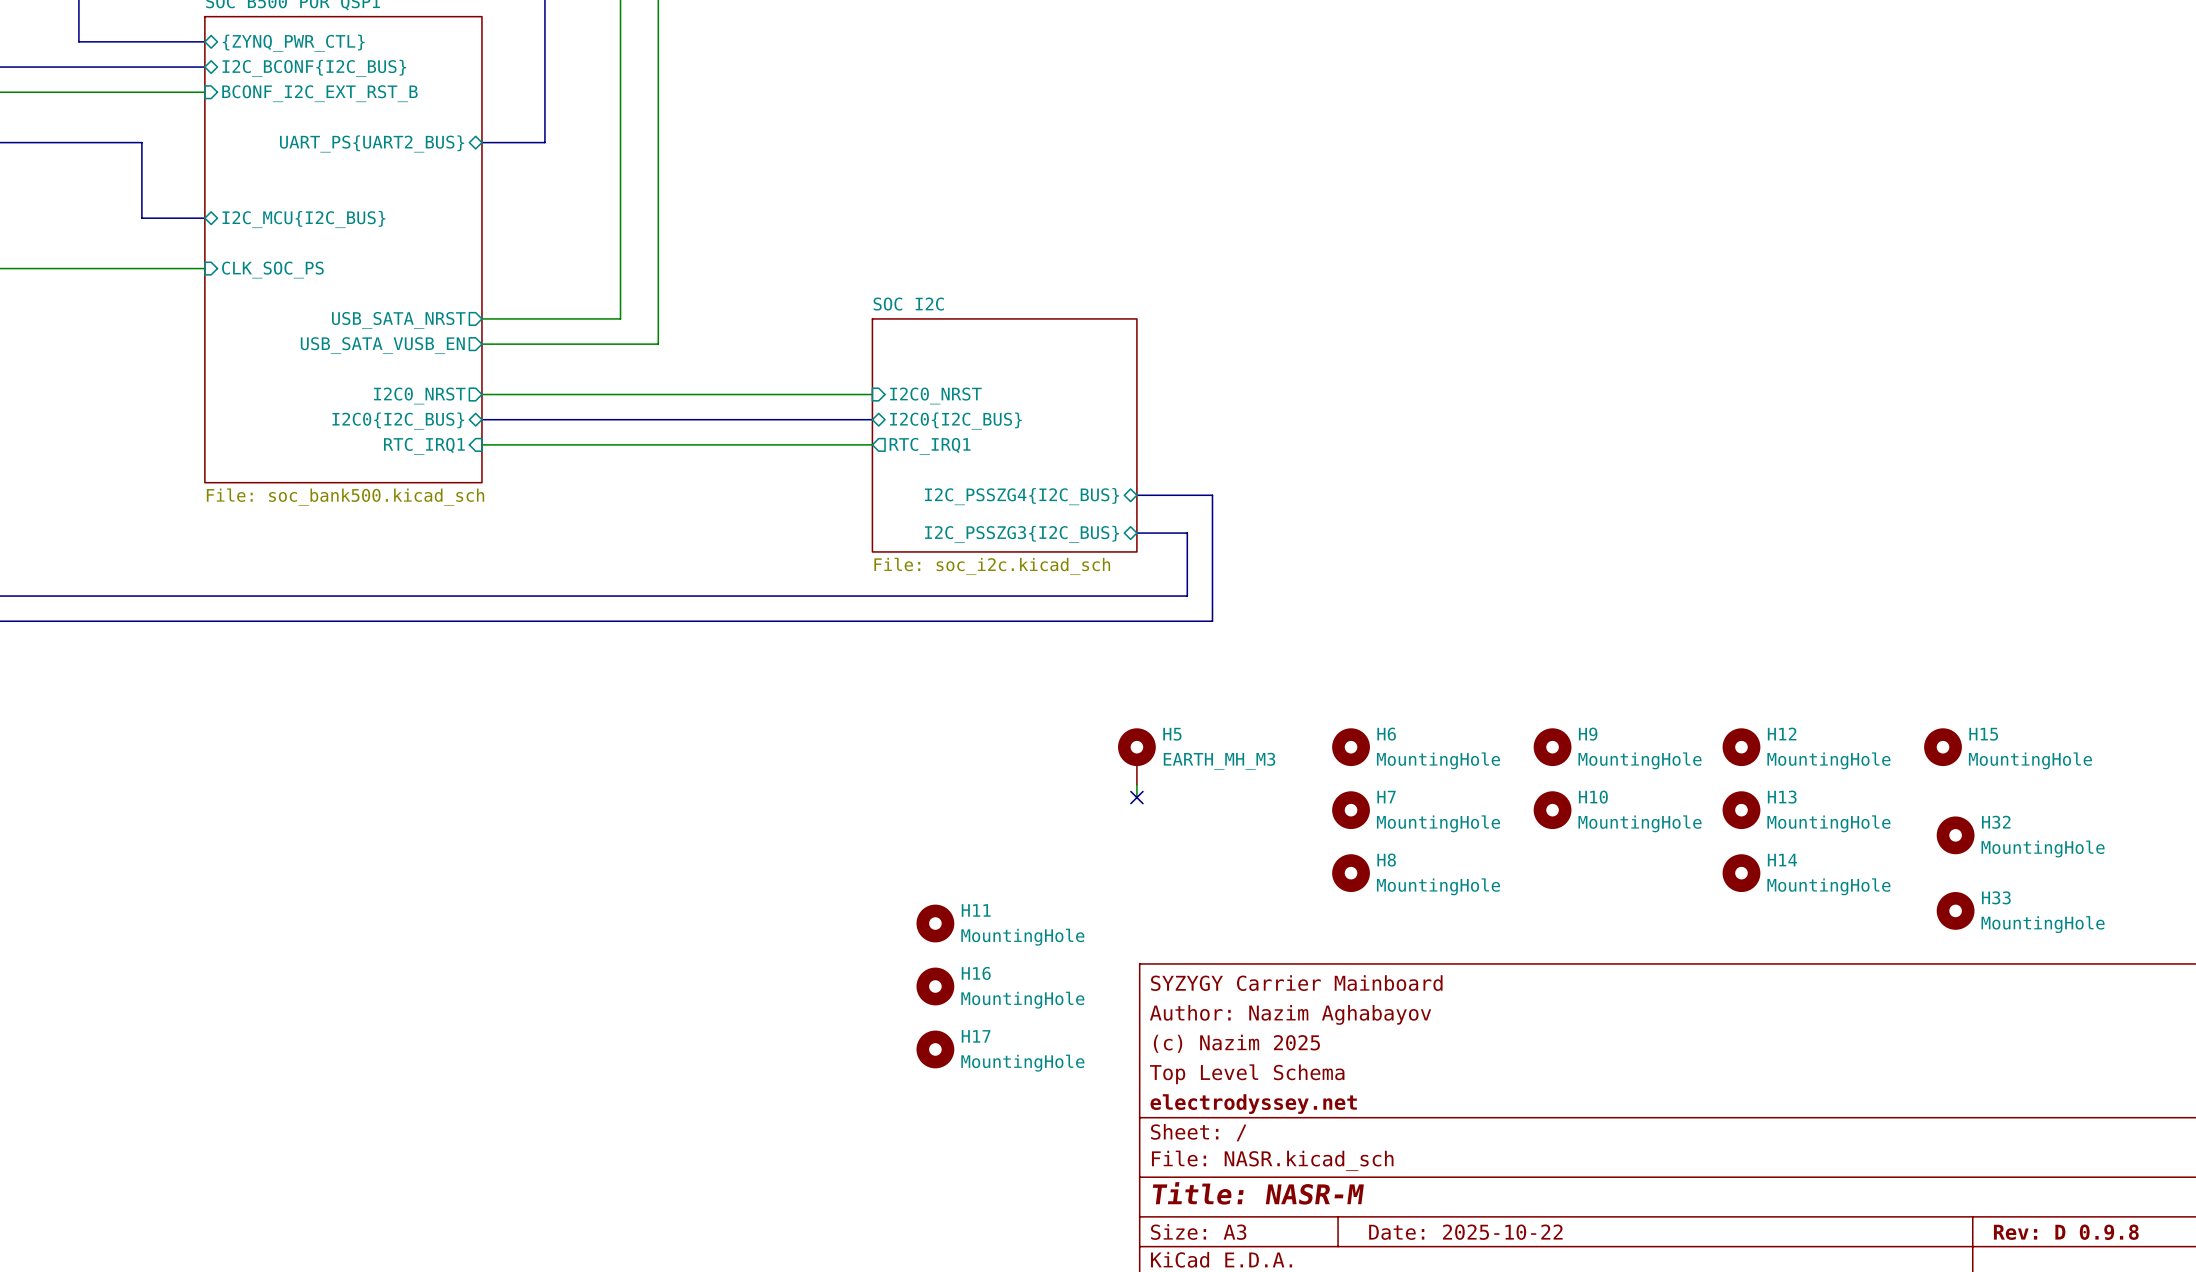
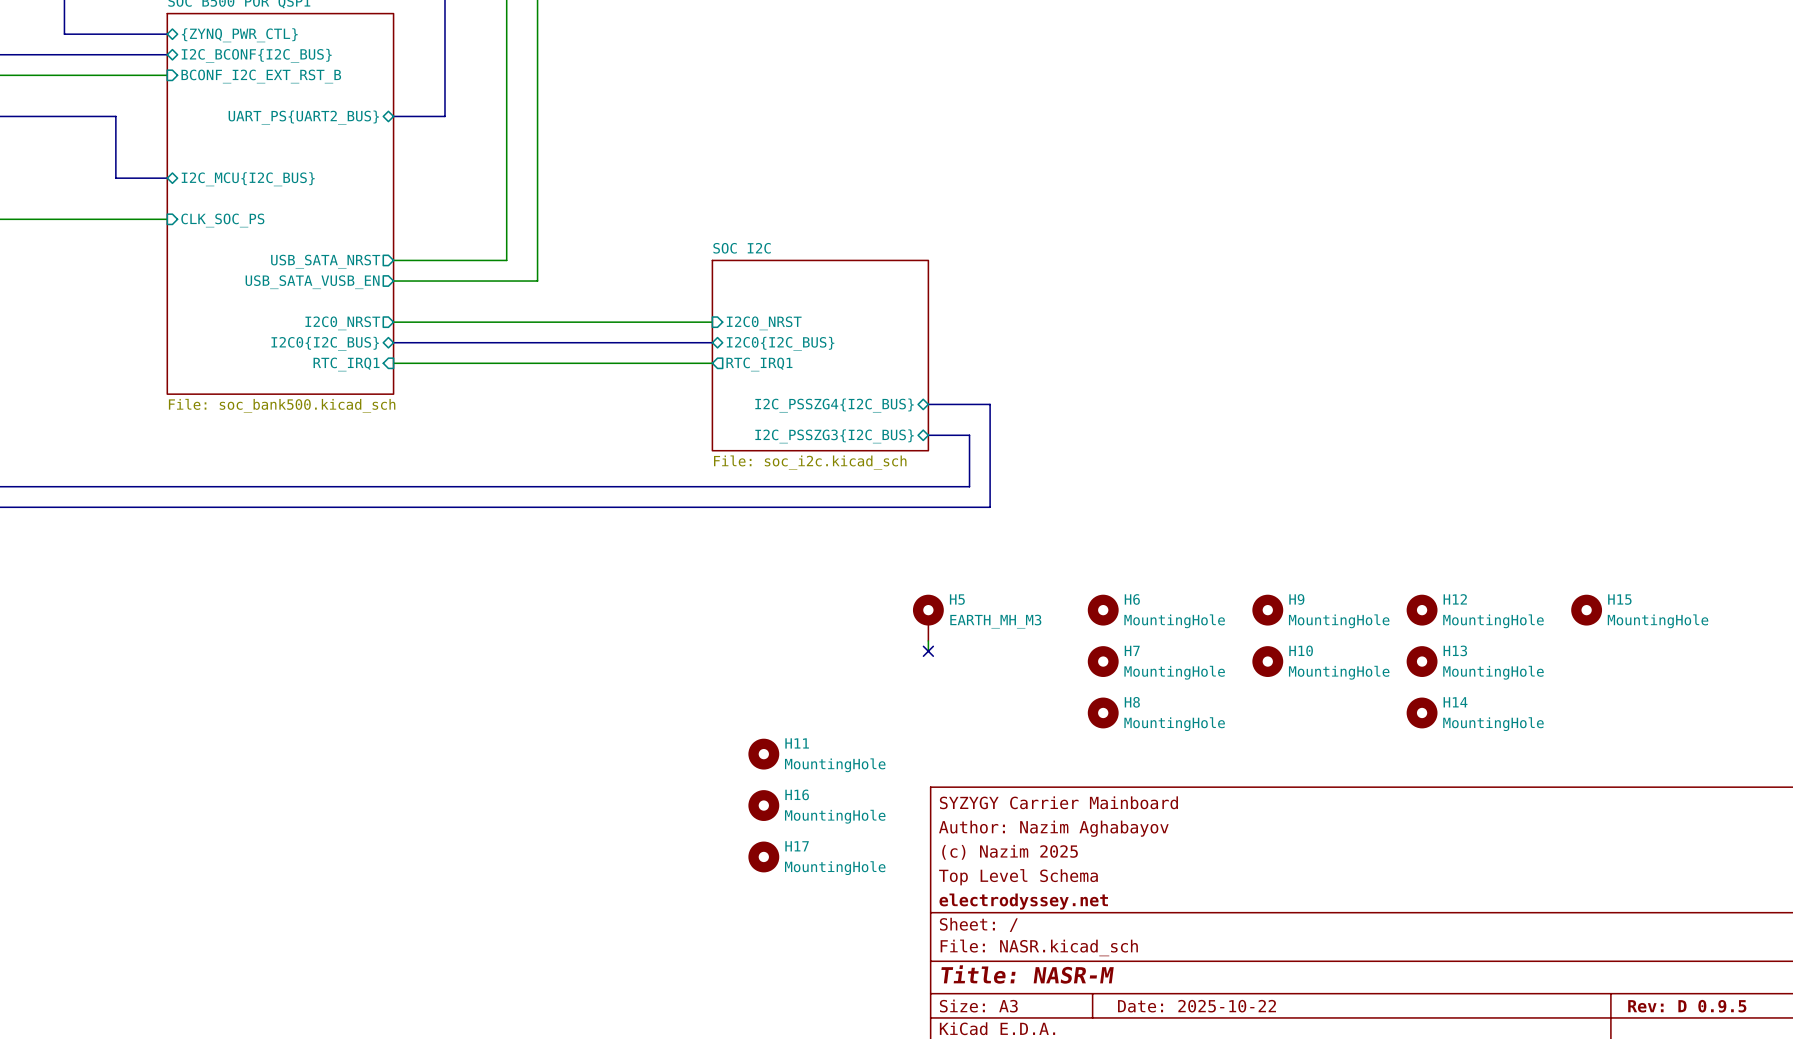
H32: MountingHole (1955, 835) -> none
H33: MountingHole (1955, 910) -> none
title block: Rev: D 0.9.8 (2066, 1232) -> Rev: D 0.9.5 (1687, 1006)

